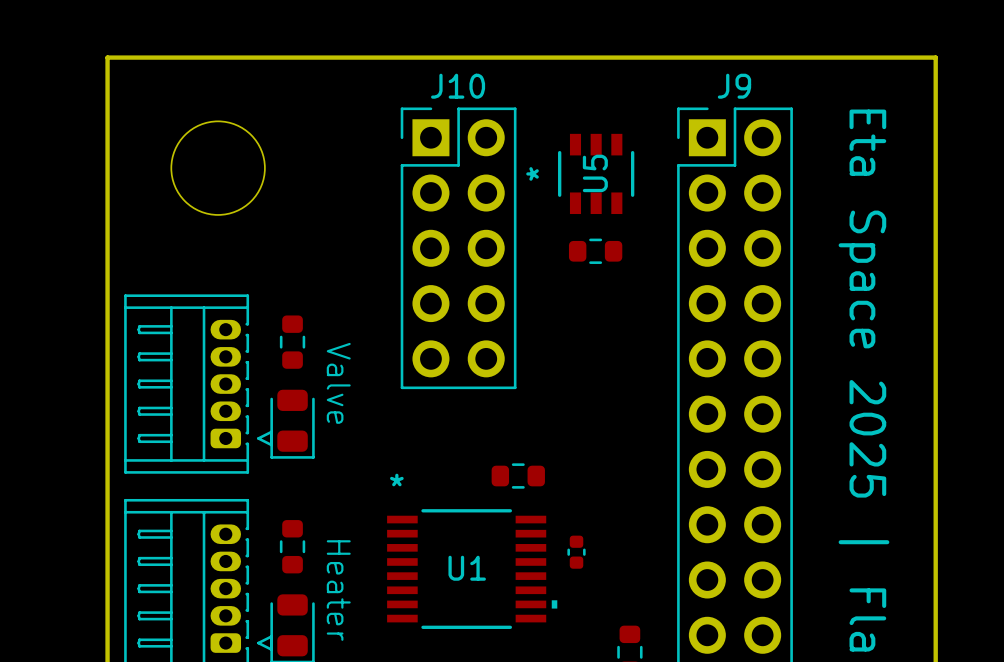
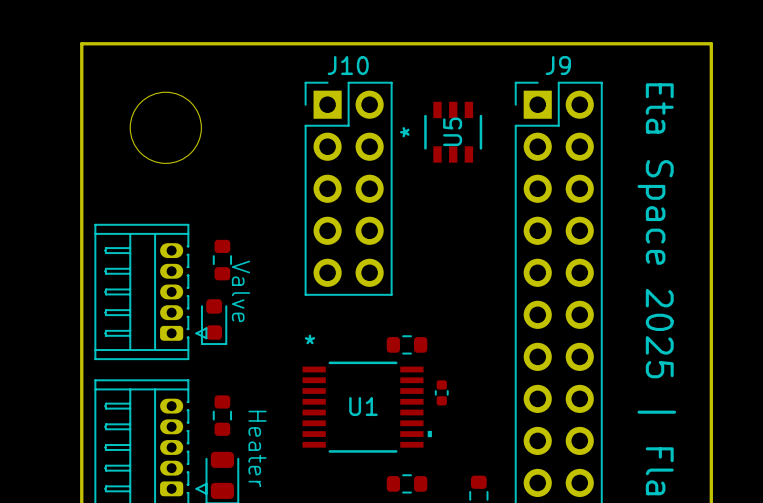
part: (595, 251) -> none
text position: Valve (338, 383) -> Valve (240, 291)
part footprint: [270, 389, 315, 459] -> [200, 299, 228, 346]
part position: (518, 476) -> (407, 344)
part position: (576, 552) -> (441, 392)
U1 position: (472, 569) -> (367, 407)
part: none -> (407, 483)

